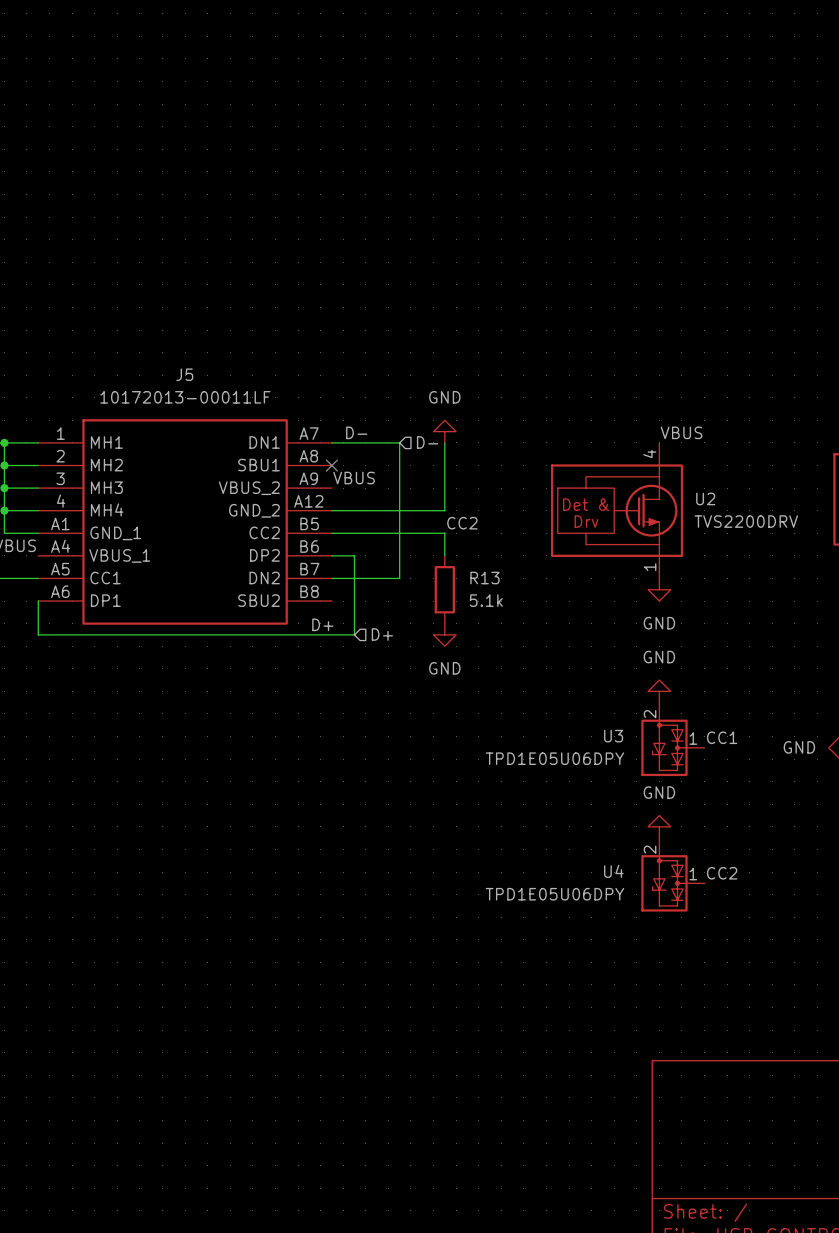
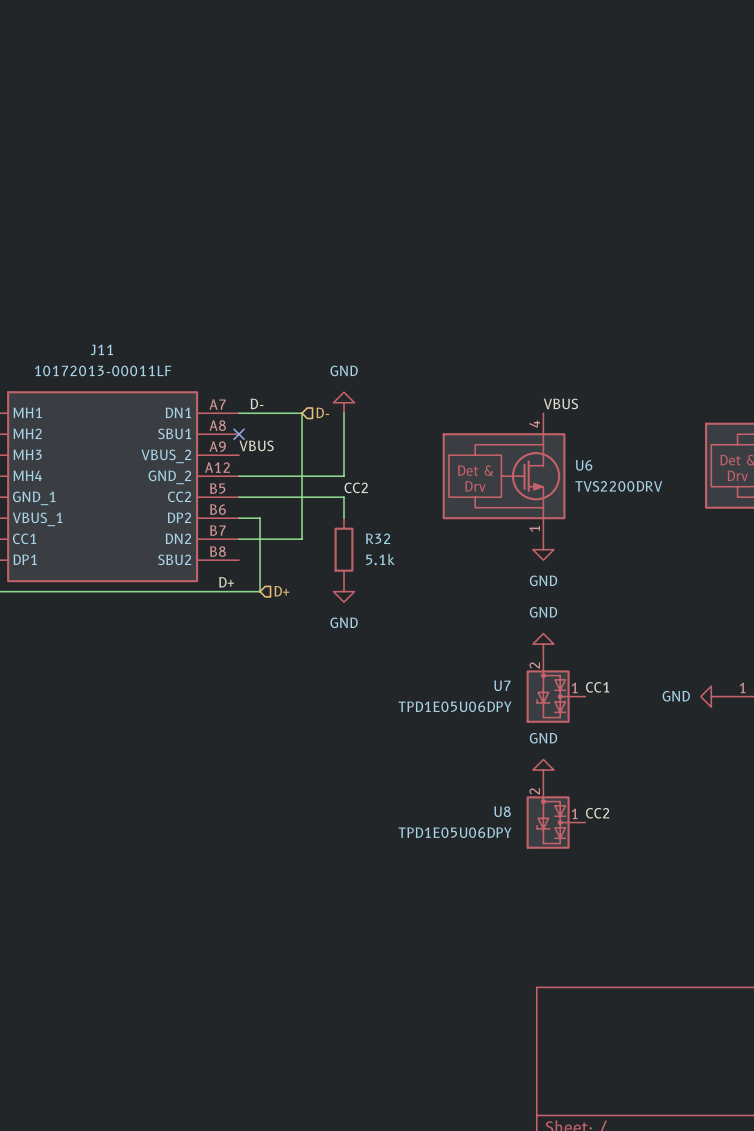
J5 name: J5 (184, 374) -> J11 (101, 349)
U2 name: U2 (705, 498) -> U6 (584, 465)
R13 name: R13 (484, 578) -> R32 (378, 538)
U3 name: U3 (613, 736) -> U7 (502, 685)
U4 name: U4 (613, 871) -> U8 (502, 811)

